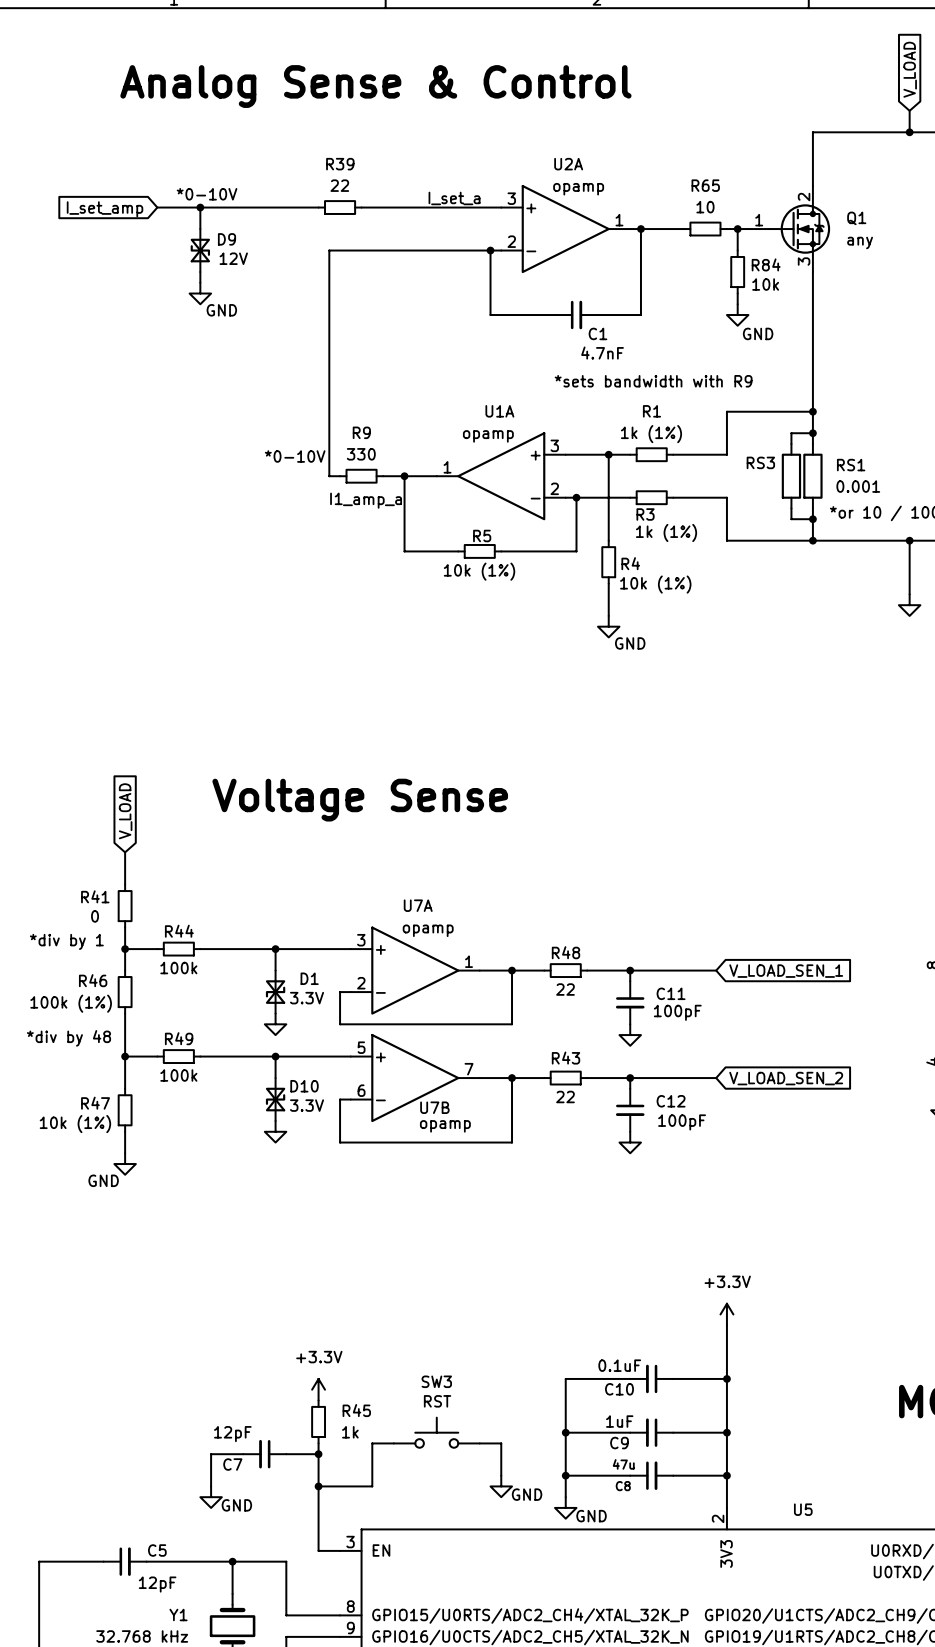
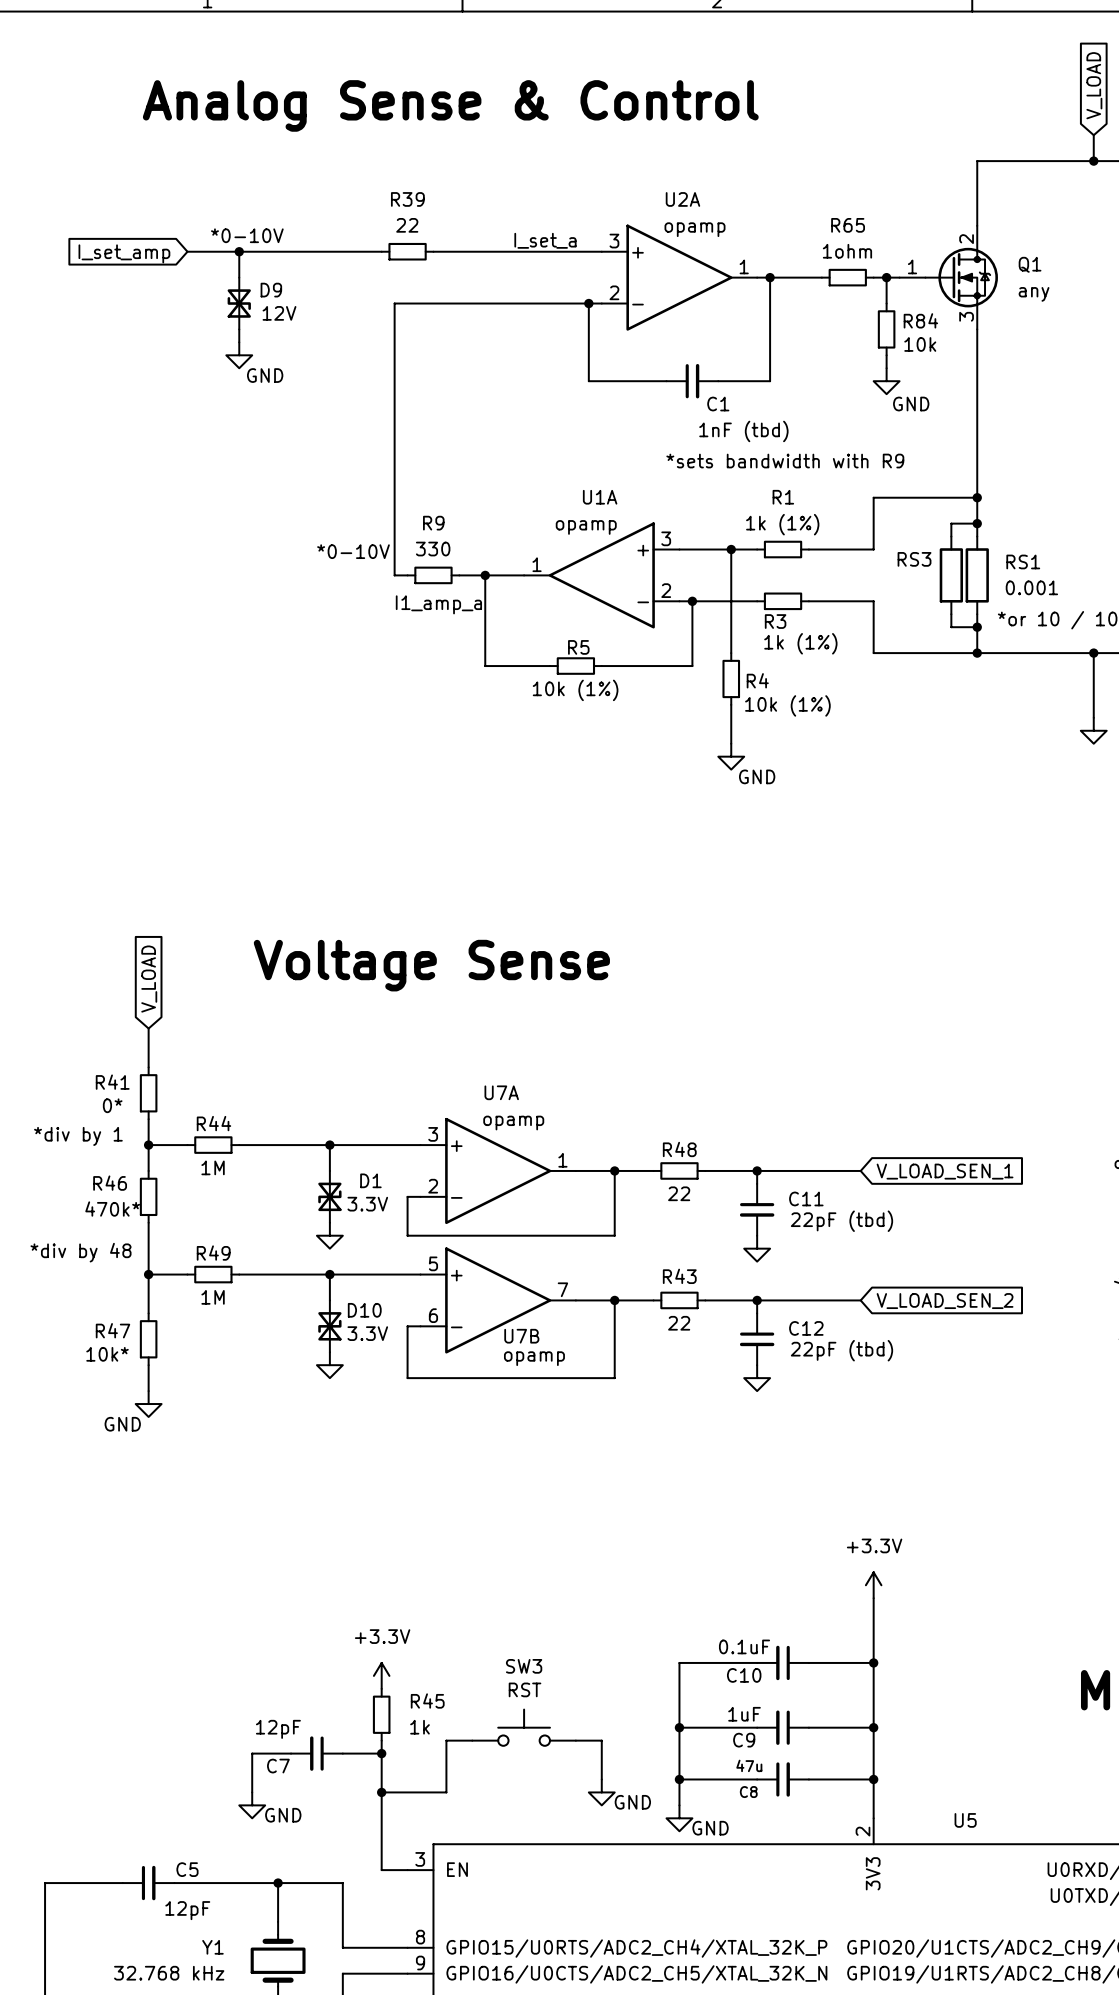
R65 value: 10 (705, 207) -> 1ohm (847, 251)
C1 value: 4.7nF (602, 353) -> 1nF (tbd) (743, 431)
R41 value: 0 (95, 916) -> 0* (112, 1105)
R44 value: 100k (178, 968) -> 1M (213, 1167)
R46 value: 100k (1%) (71, 1003) -> 470k* (112, 1209)
C11 value: 100pF (677, 1012) -> 22pF (tbd) (841, 1221)
R49 value: 100k (178, 1075) -> 1M (213, 1297)
C12 value: 100pF (682, 1122) -> 22pF (tbd) (841, 1350)
R47 value: 10k (1%) (75, 1124) -> 10k* (107, 1354)

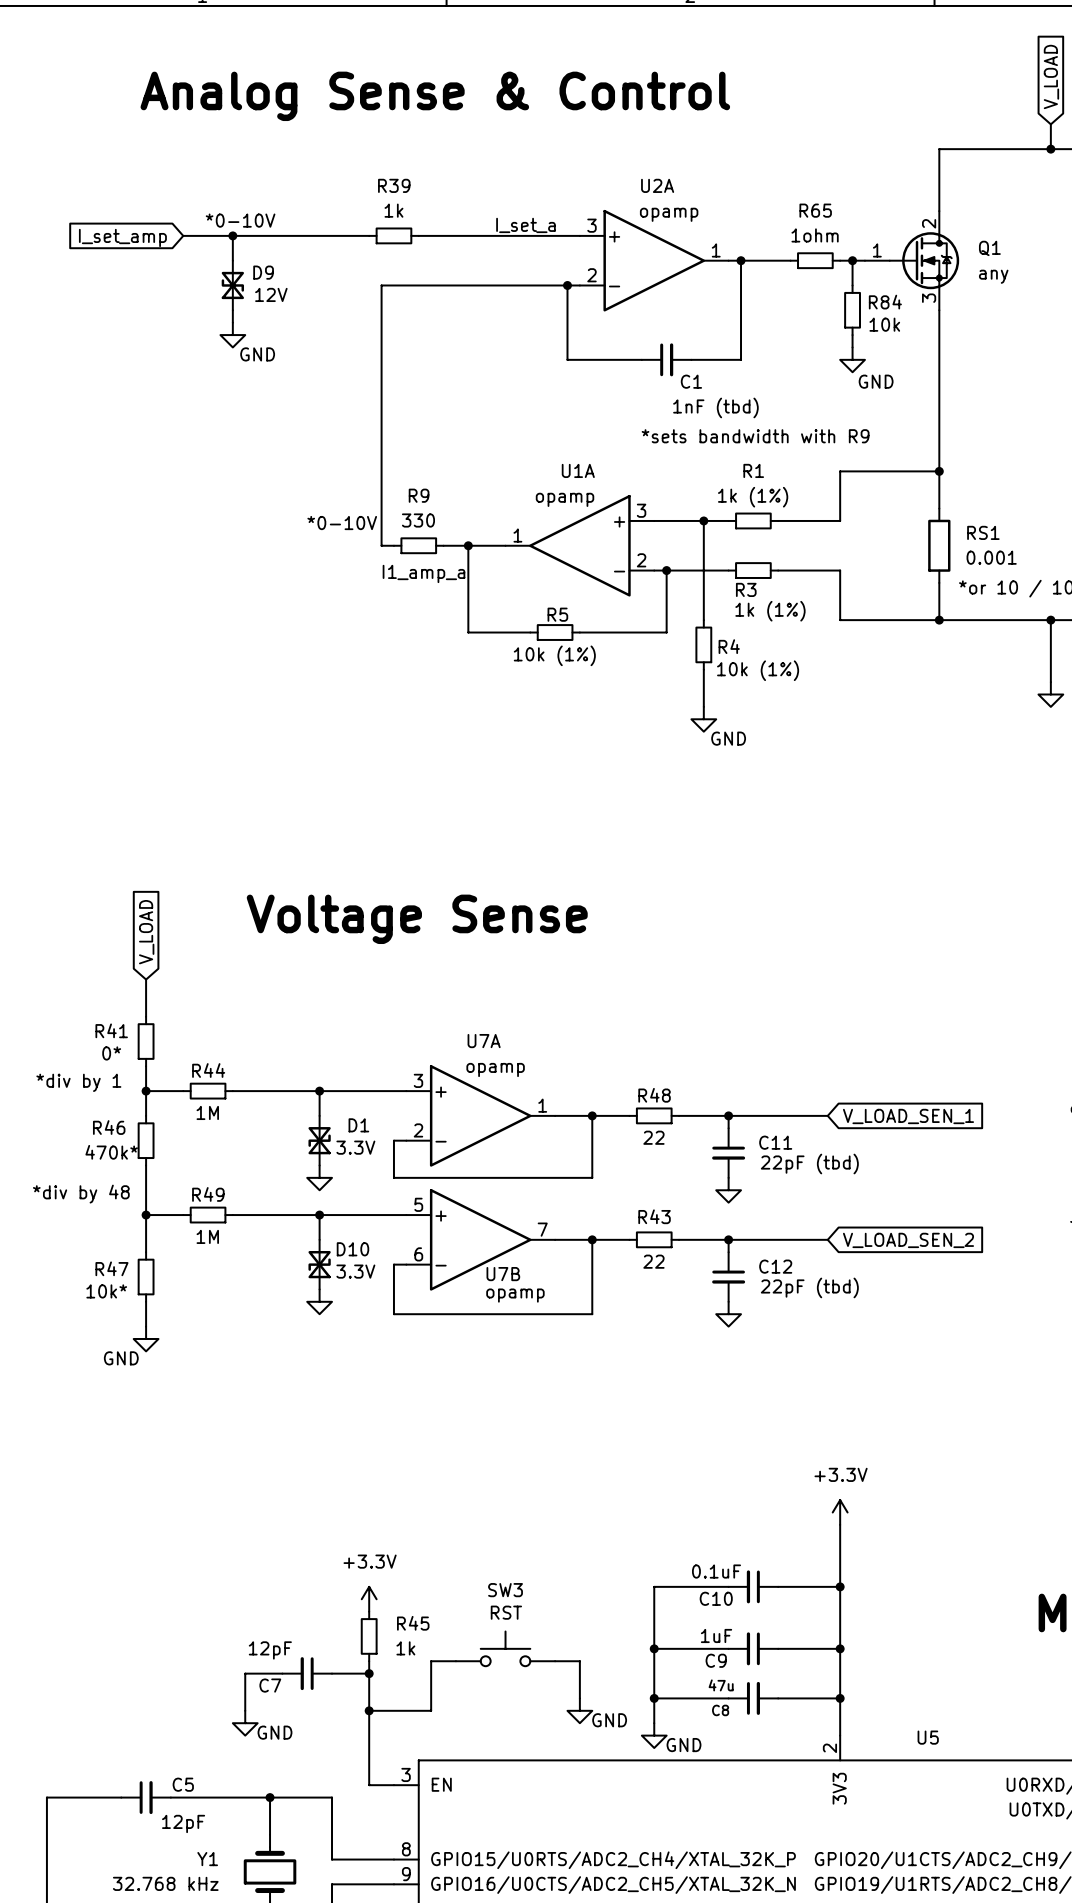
R39 value: 22 (407, 225) -> 1k (393, 210)
wire: (977, 523) (951, 523) (951, 536) -> none
junction: (977, 523) -> none
RS3: (951, 575) -> none
wire: (951, 614) (951, 627) (977, 627) -> none
junction: (977, 627) -> none

